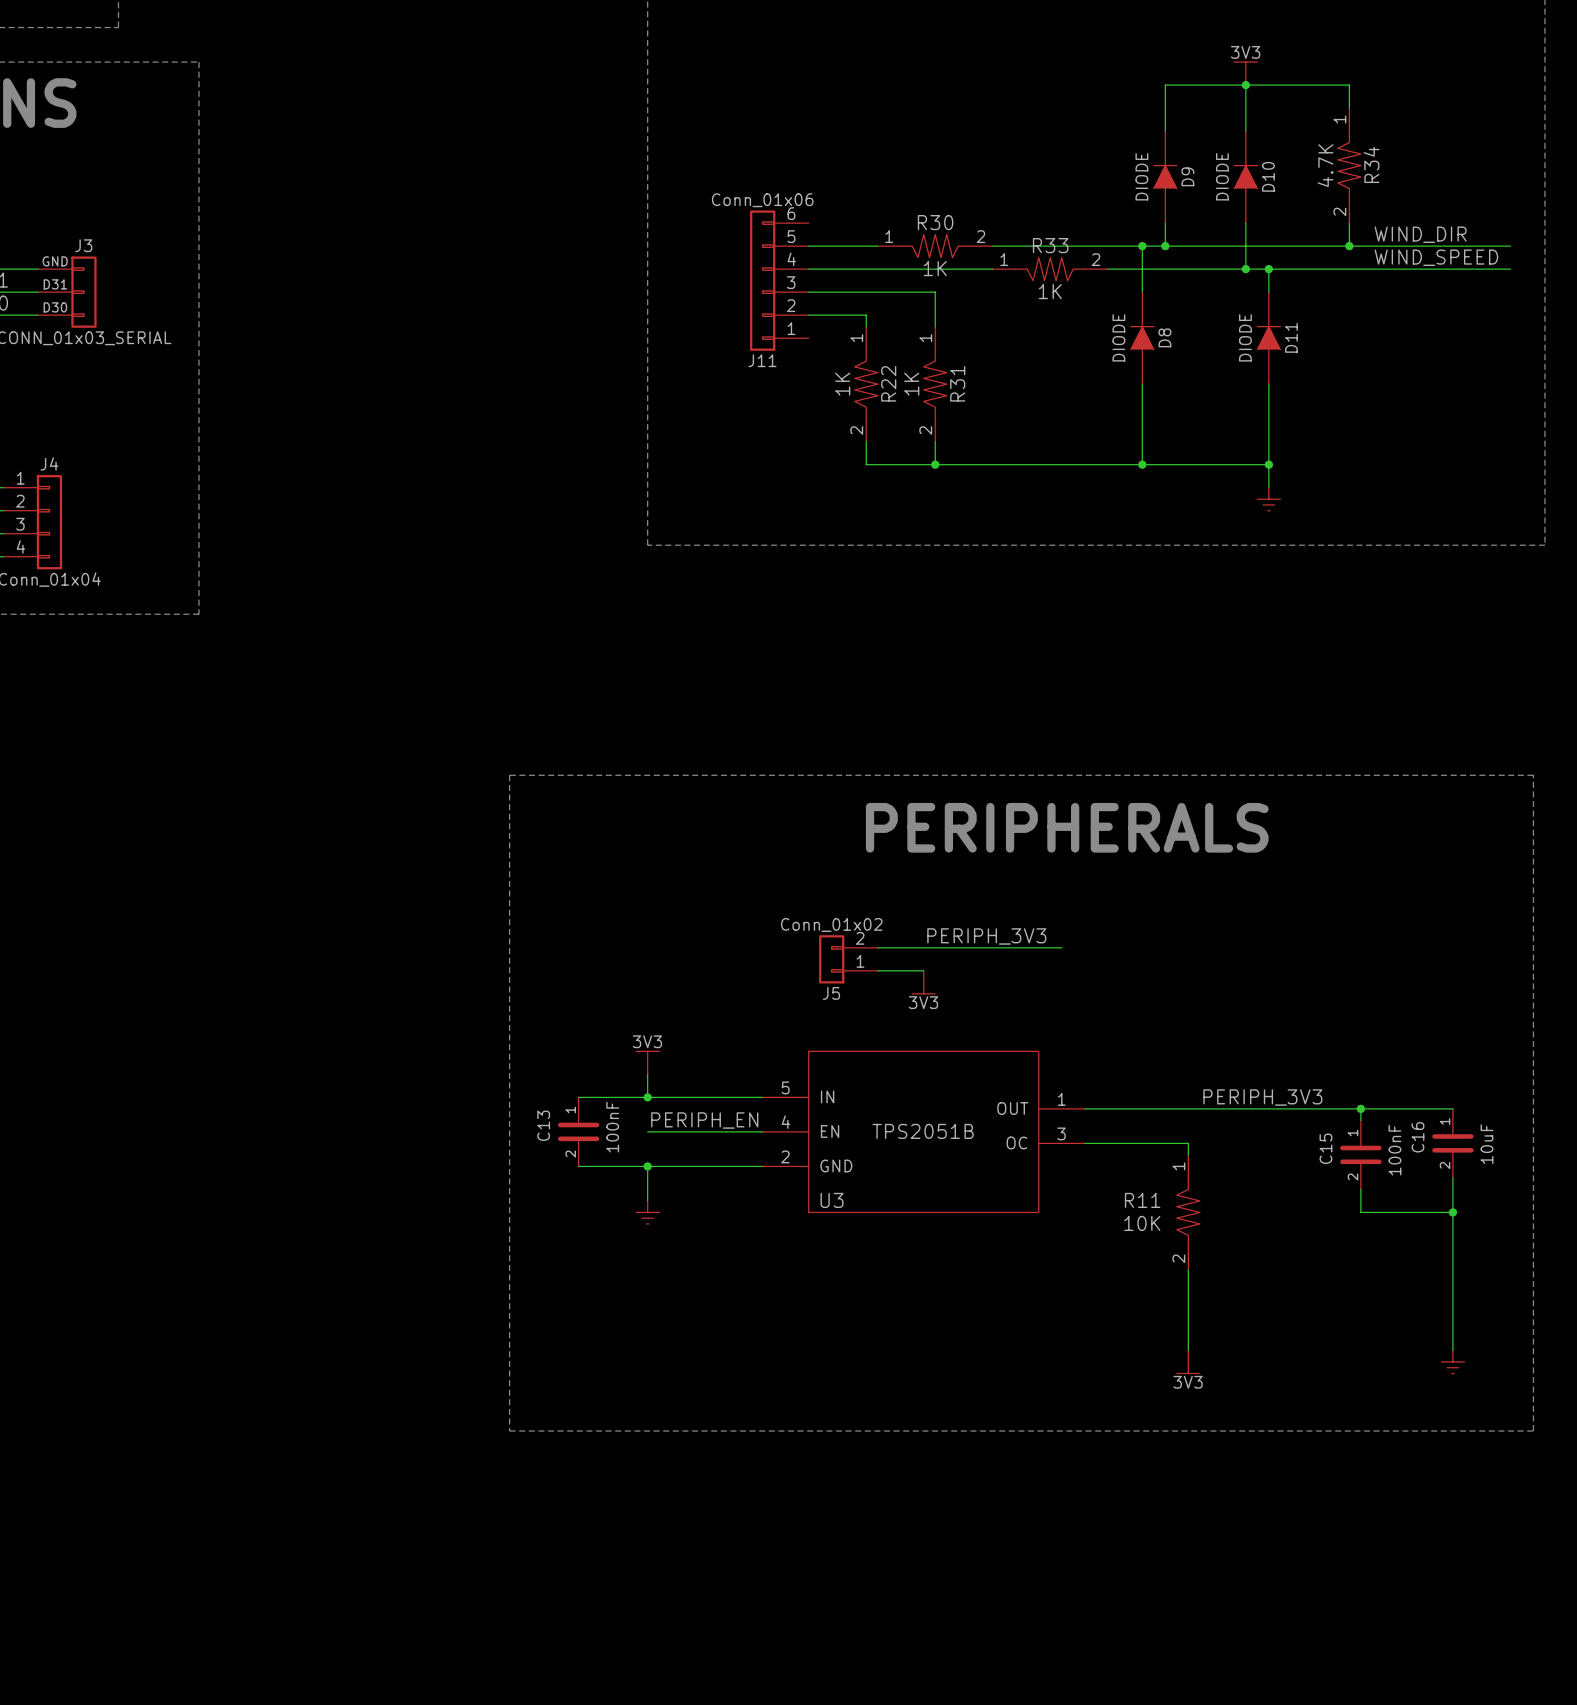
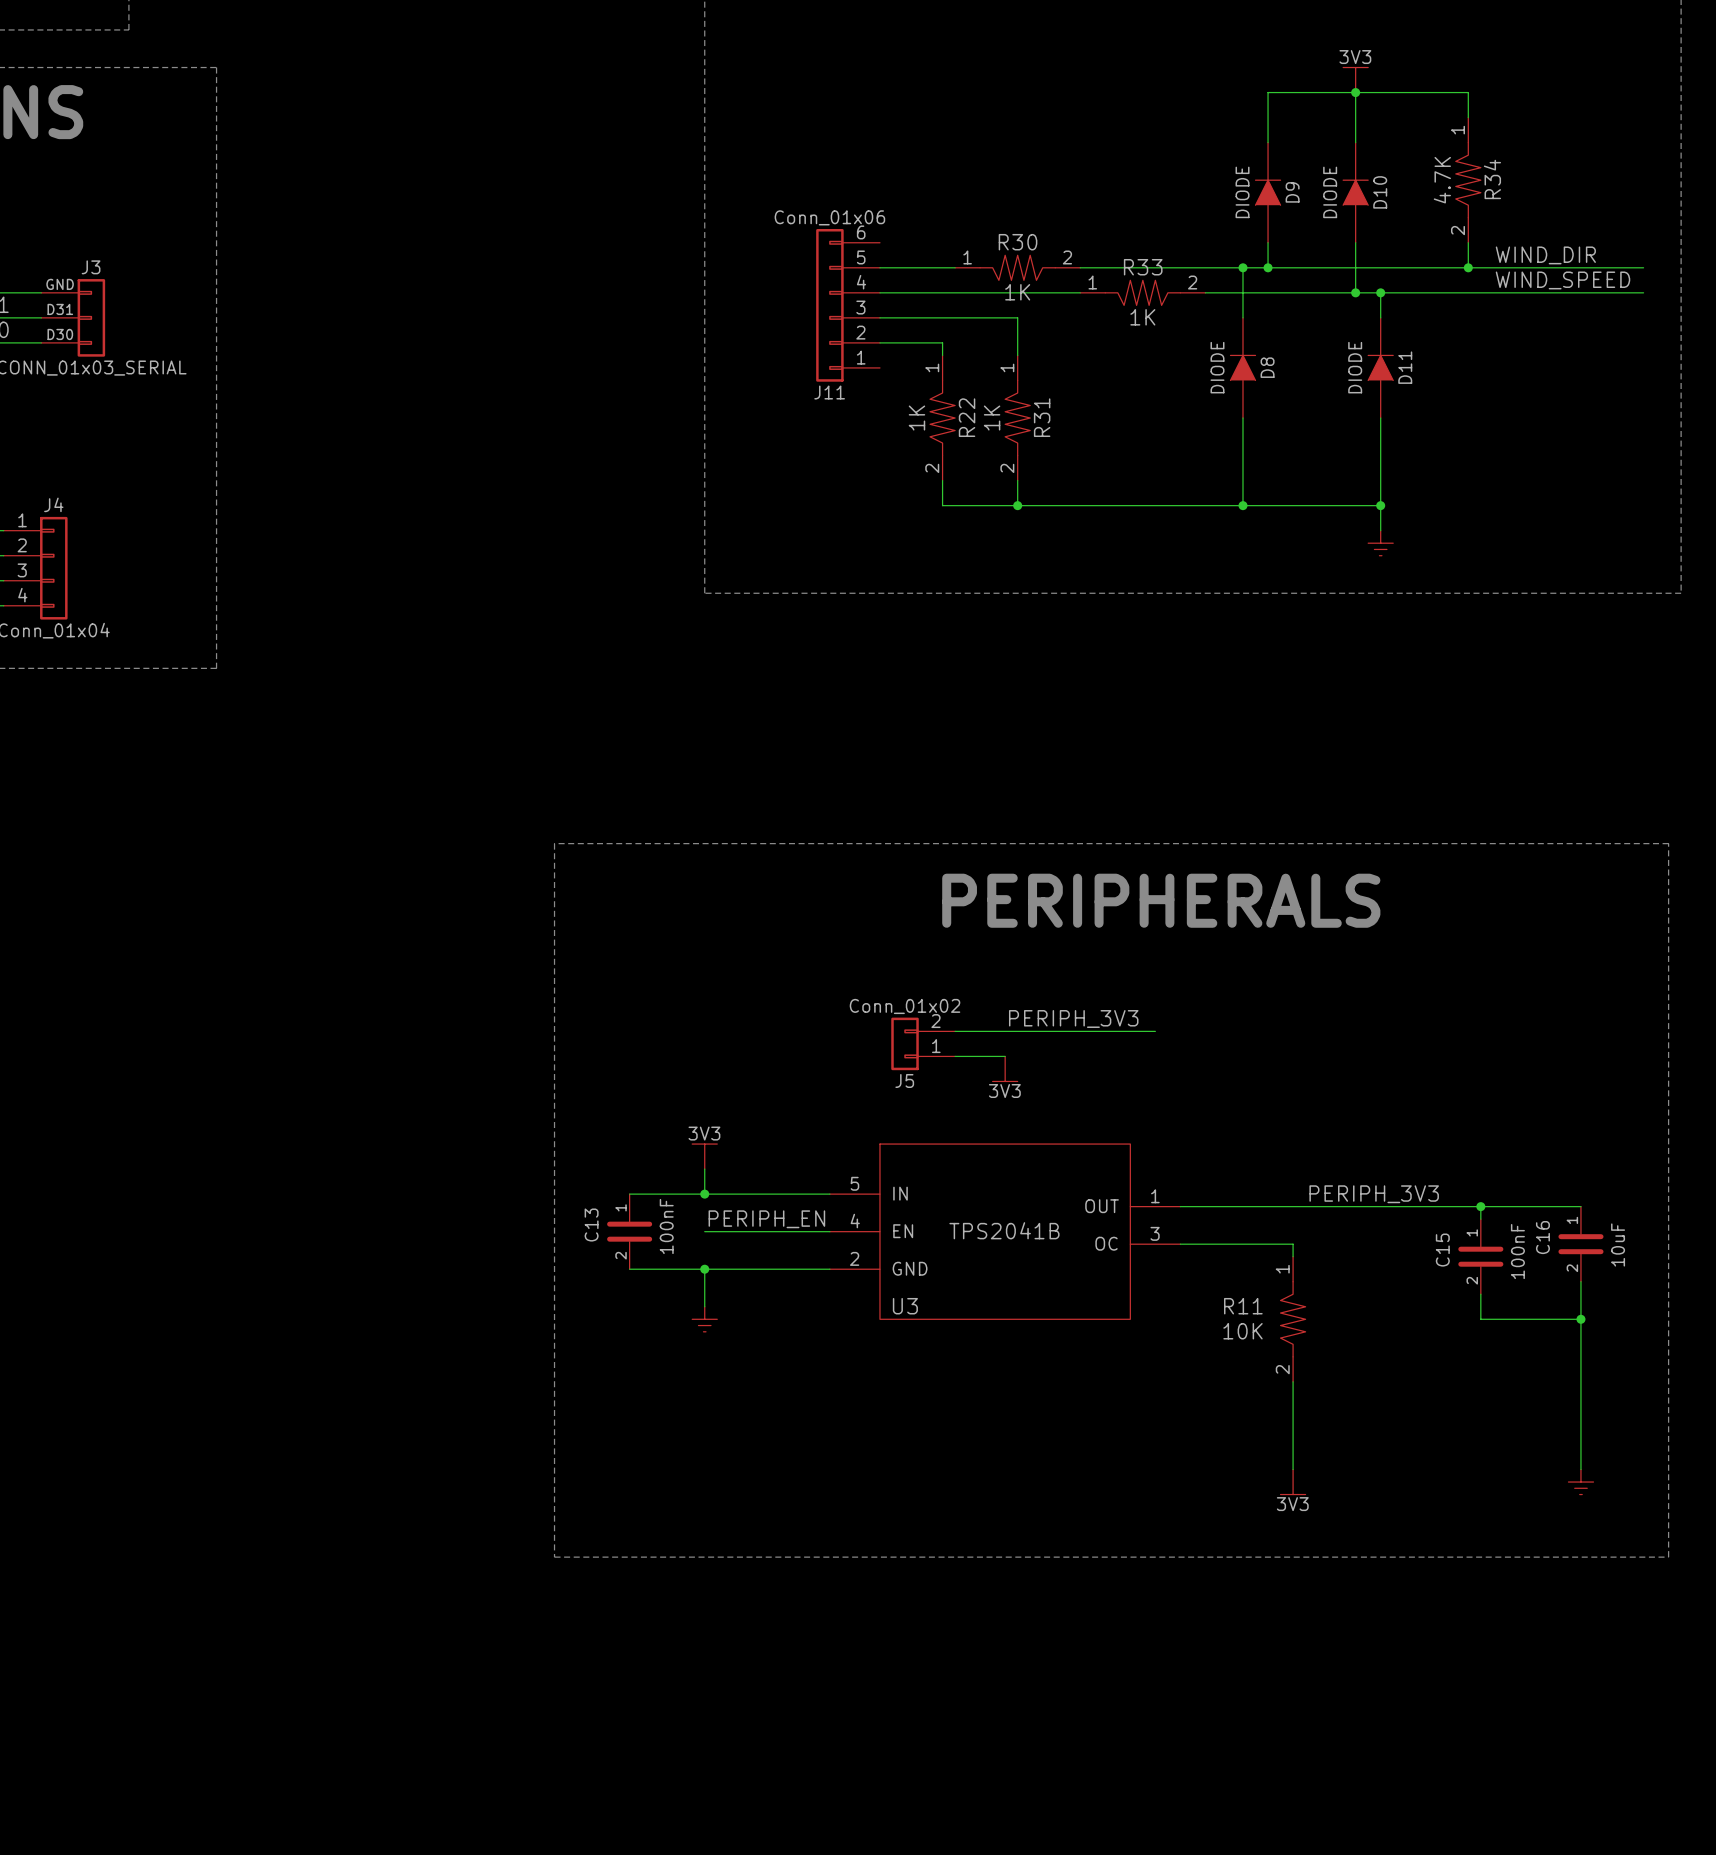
U3 value: TPS2051B (923, 1131) -> TPS2041B (1004, 1230)

